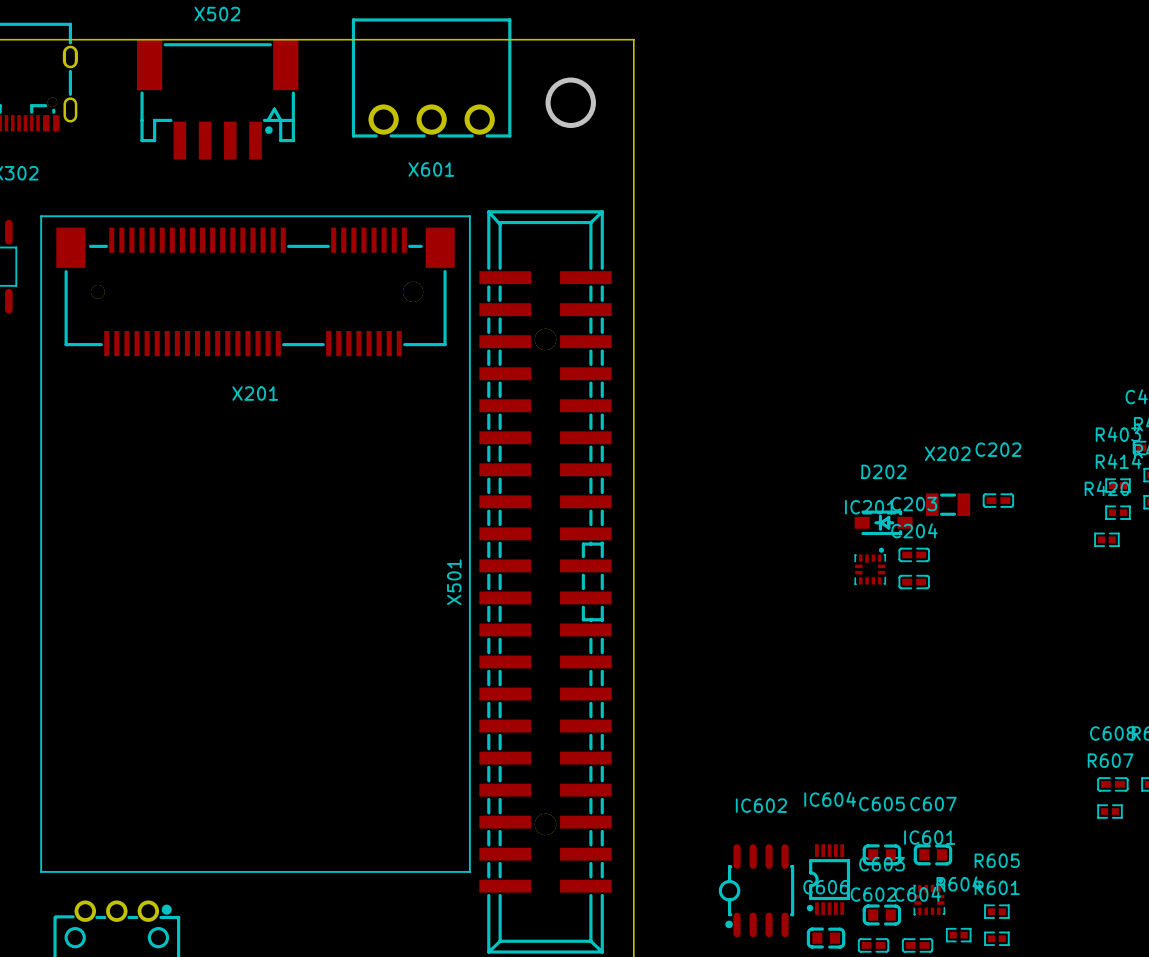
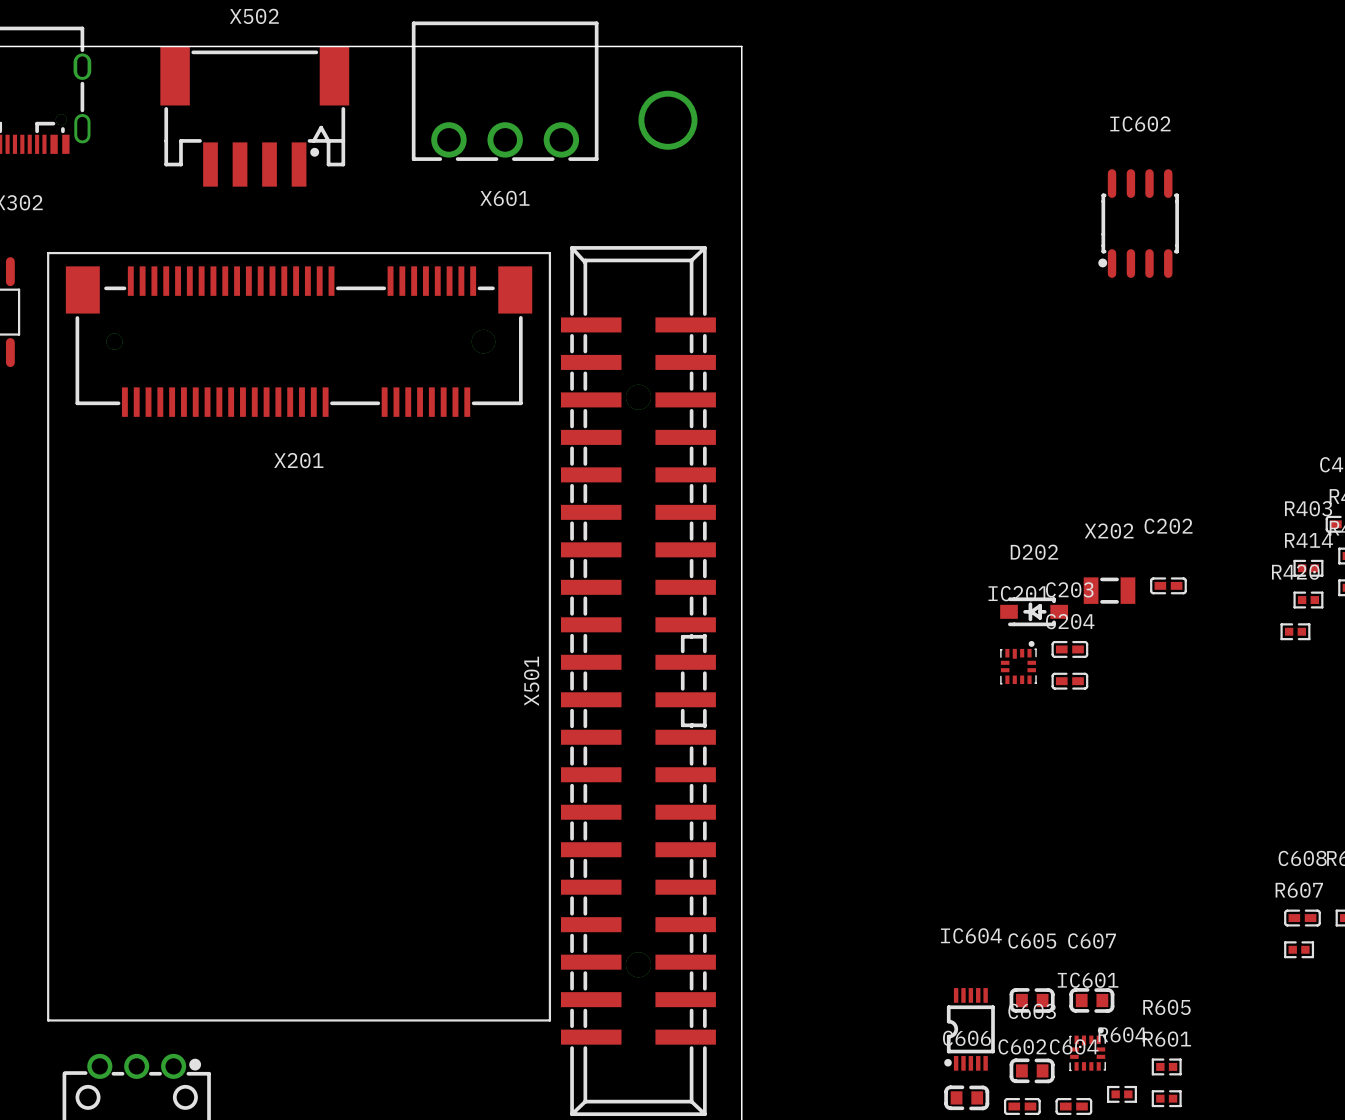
IC602 footprint: [718, 844, 795, 938] -> [1098, 169, 1179, 278]

